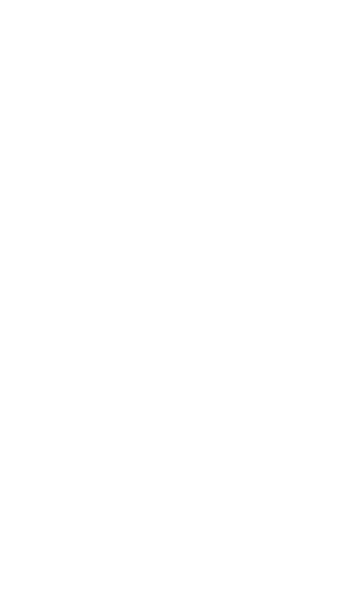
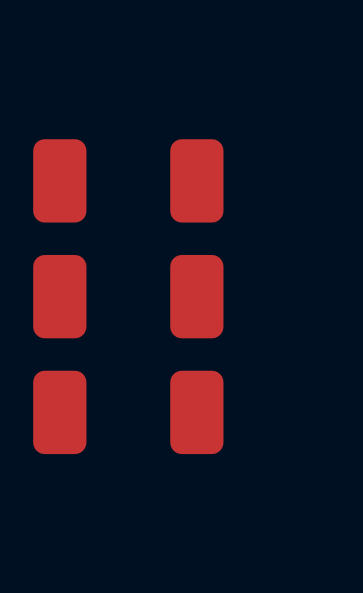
part: none -> (128, 180)
part: none -> (128, 296)
part: none -> (128, 412)

